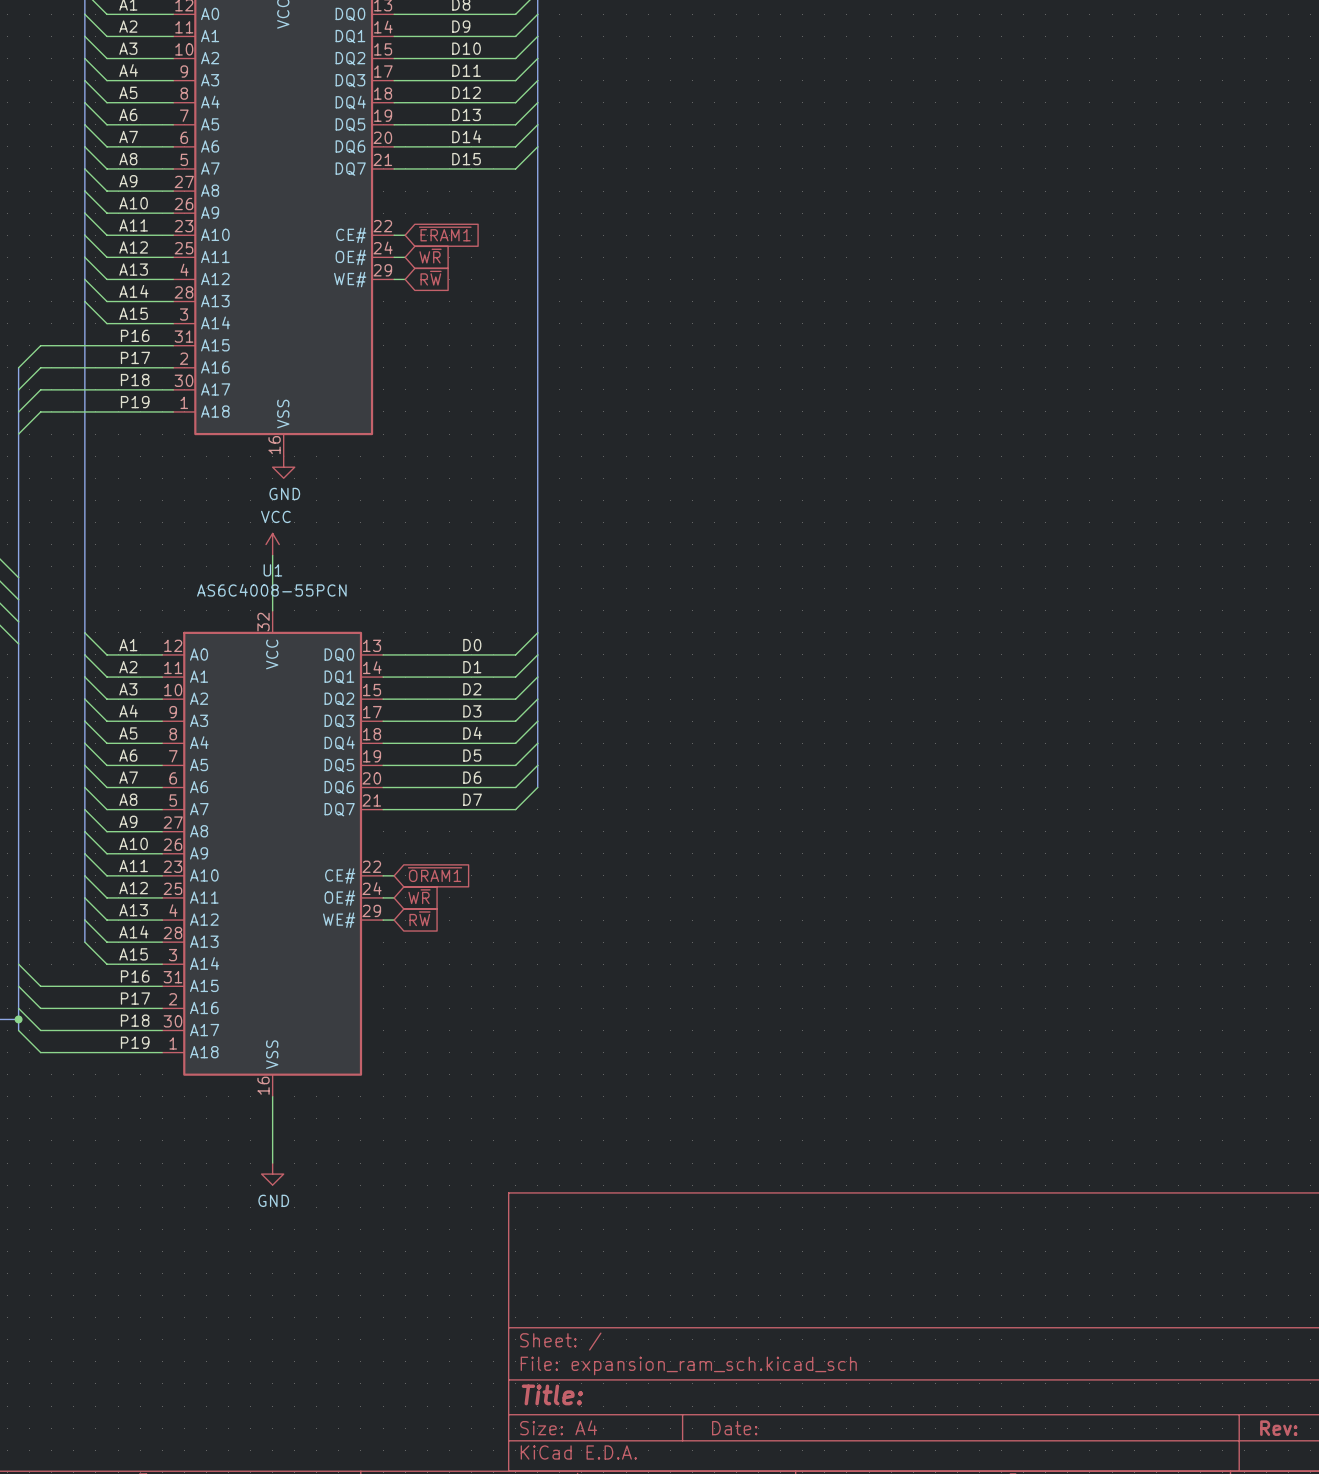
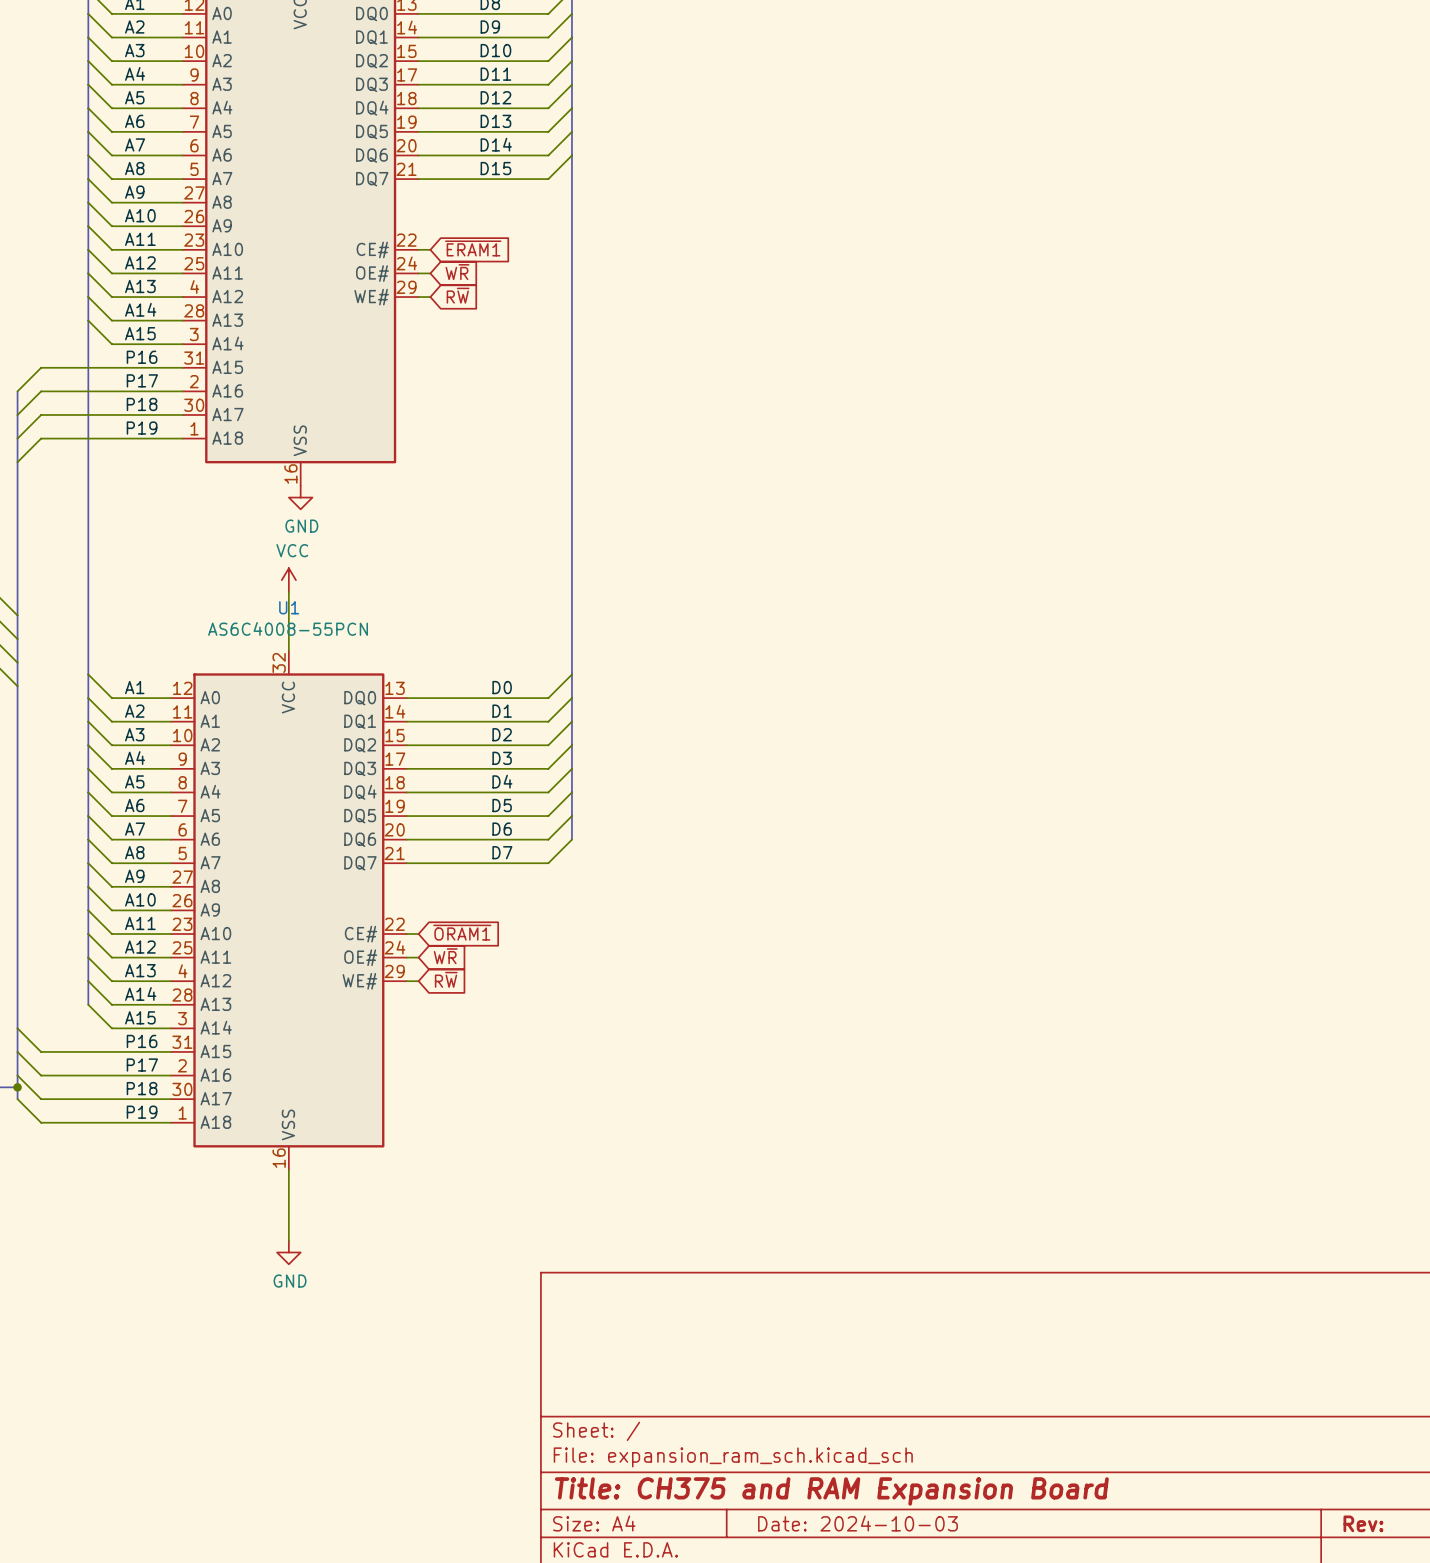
title block: Title: (552, 1394) -> Title: CH375 and RAM Expansion Board (831, 1491)
title block: Date: (734, 1428) -> Date: 2024-10-03 (858, 1523)

